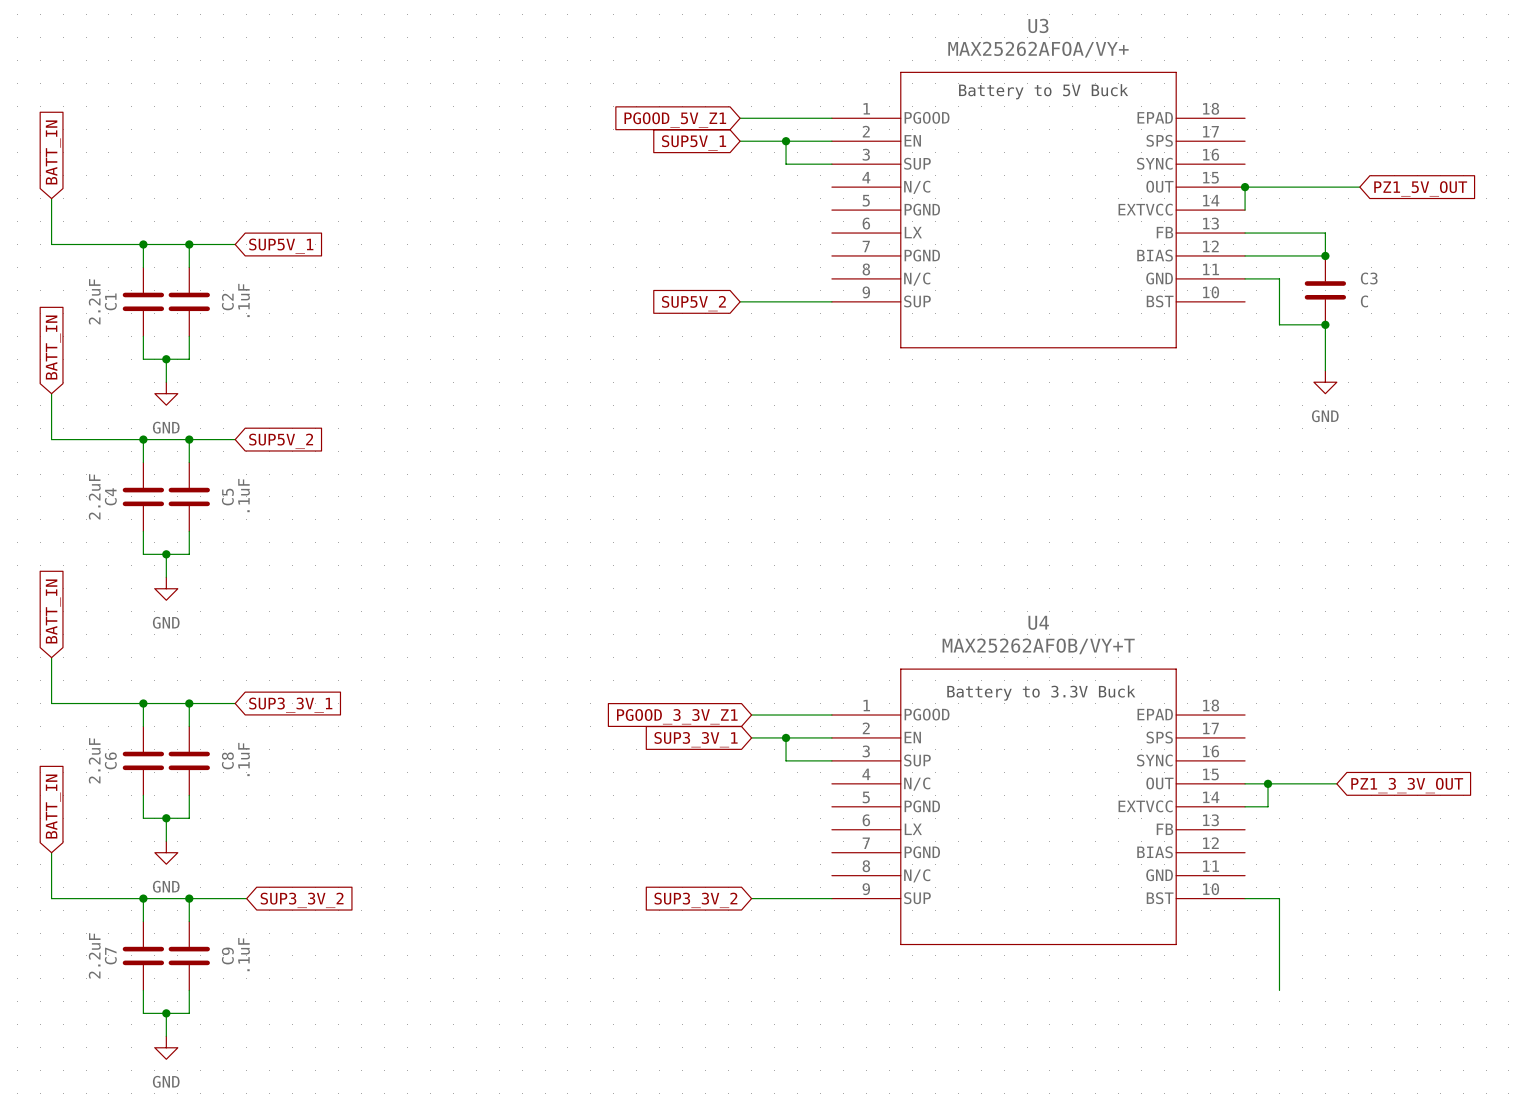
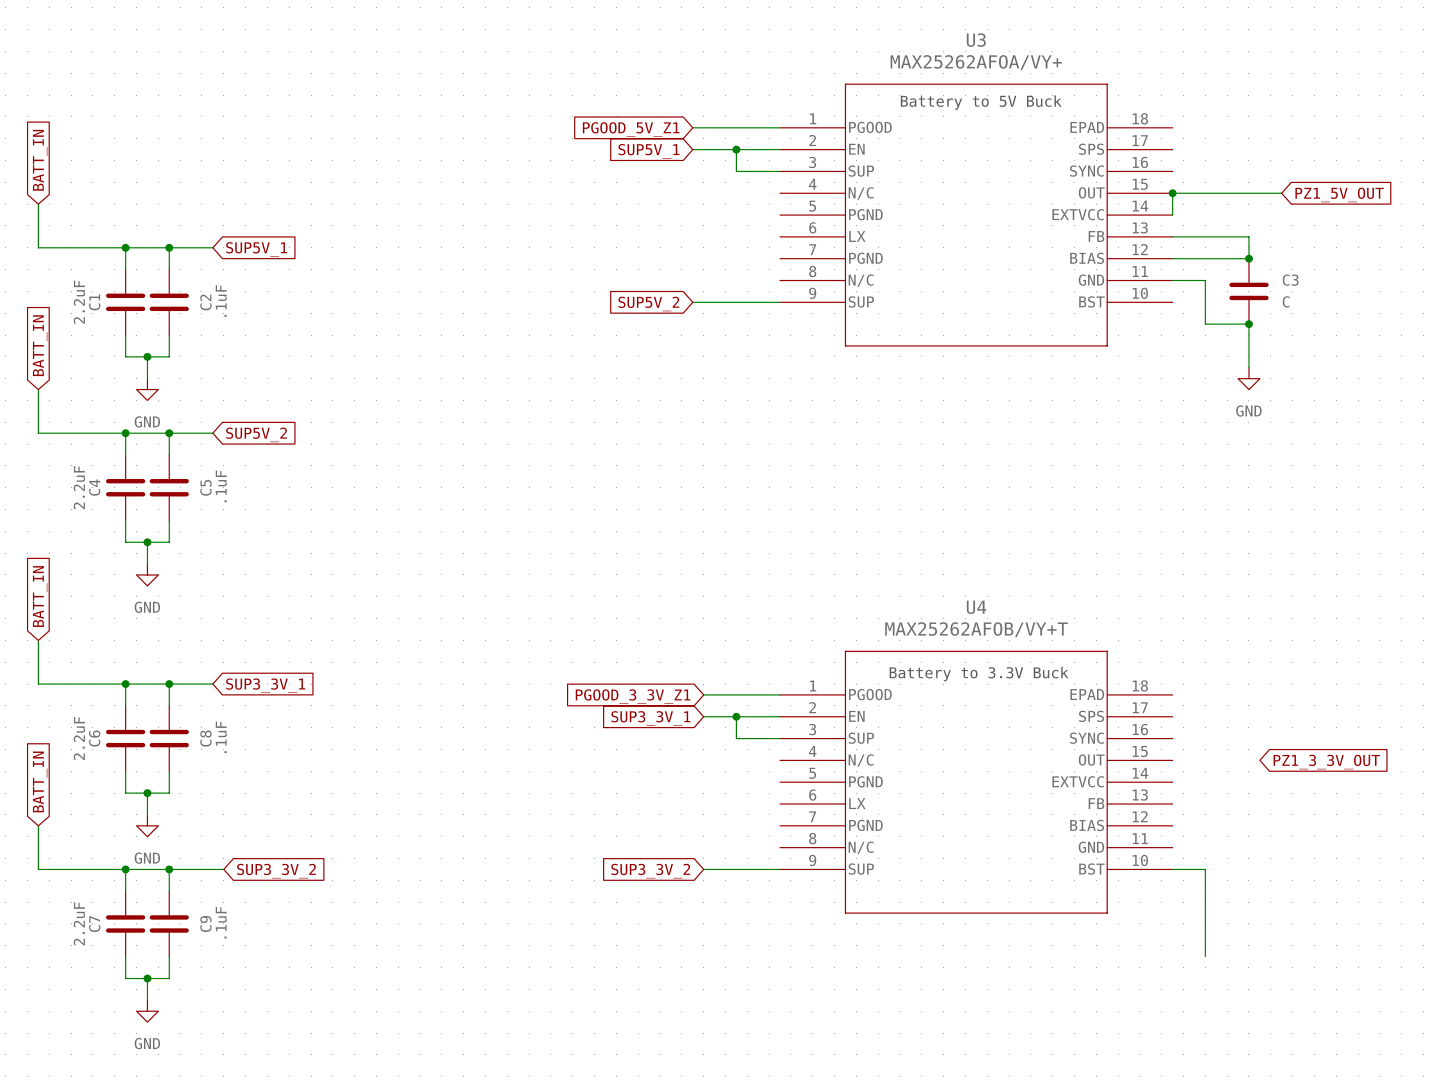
wire: (1245, 783) (1336, 783) -> none
wire: (1268, 783) (1268, 806) (1245, 806) -> none
junction: (1268, 783) -> none

